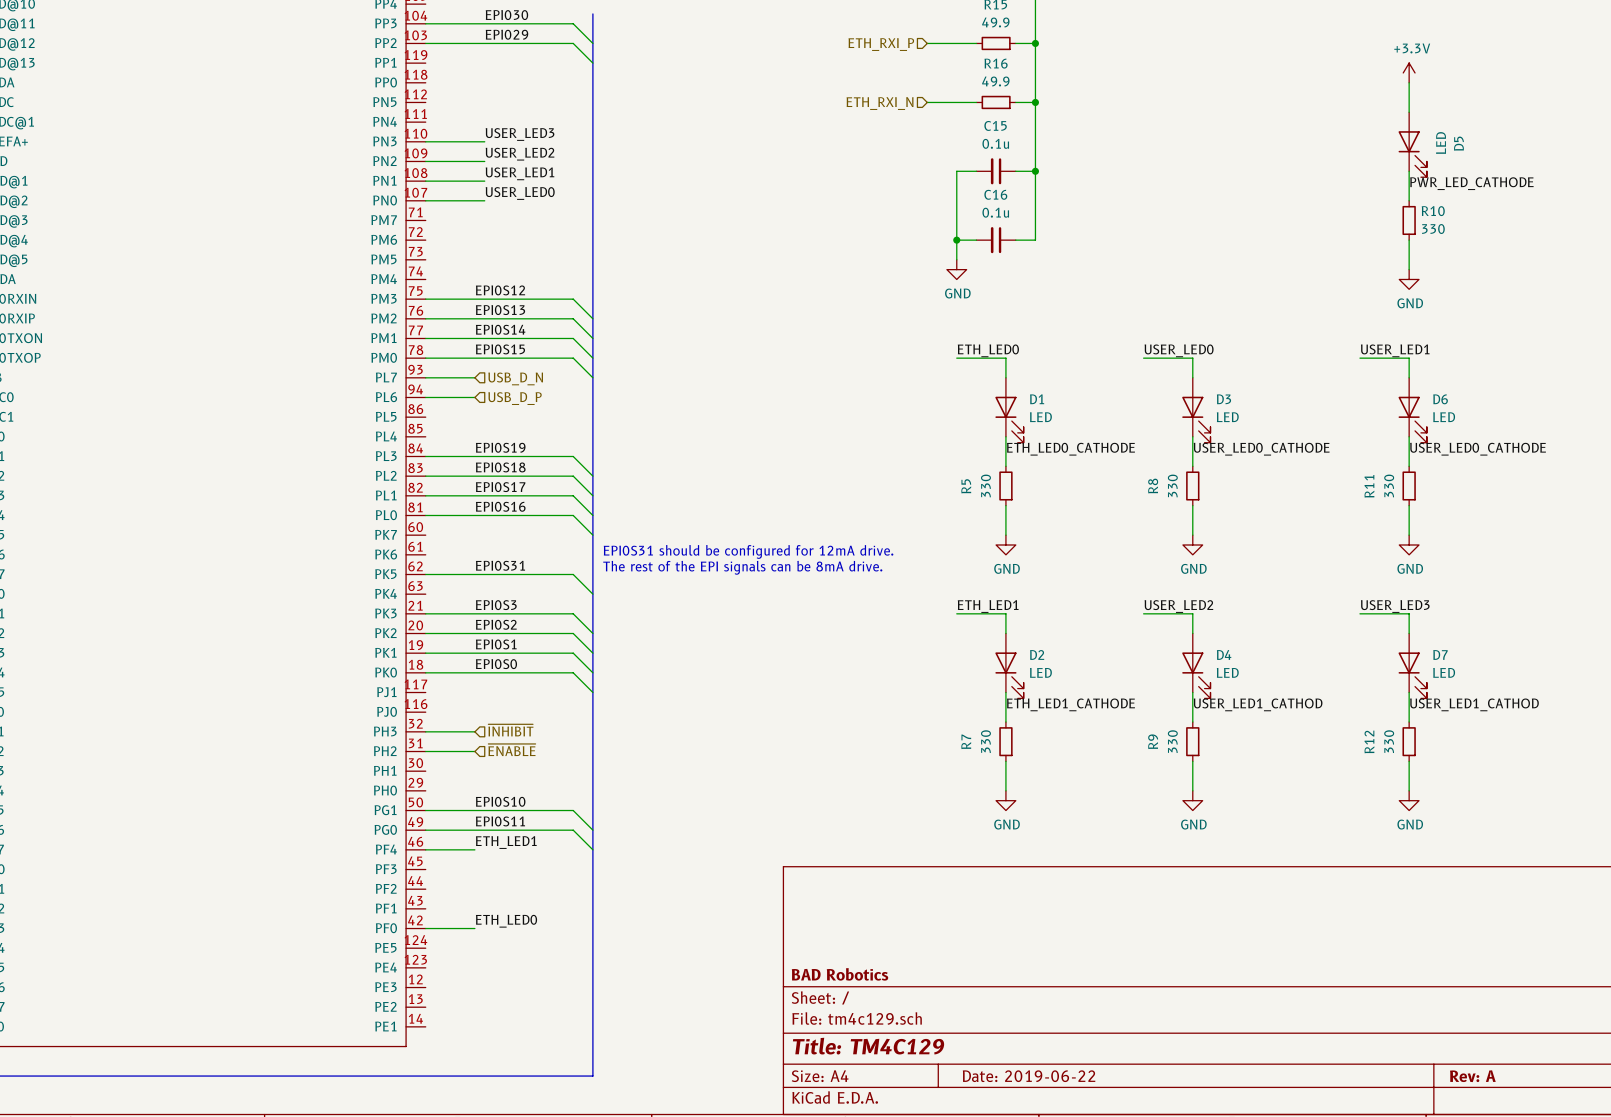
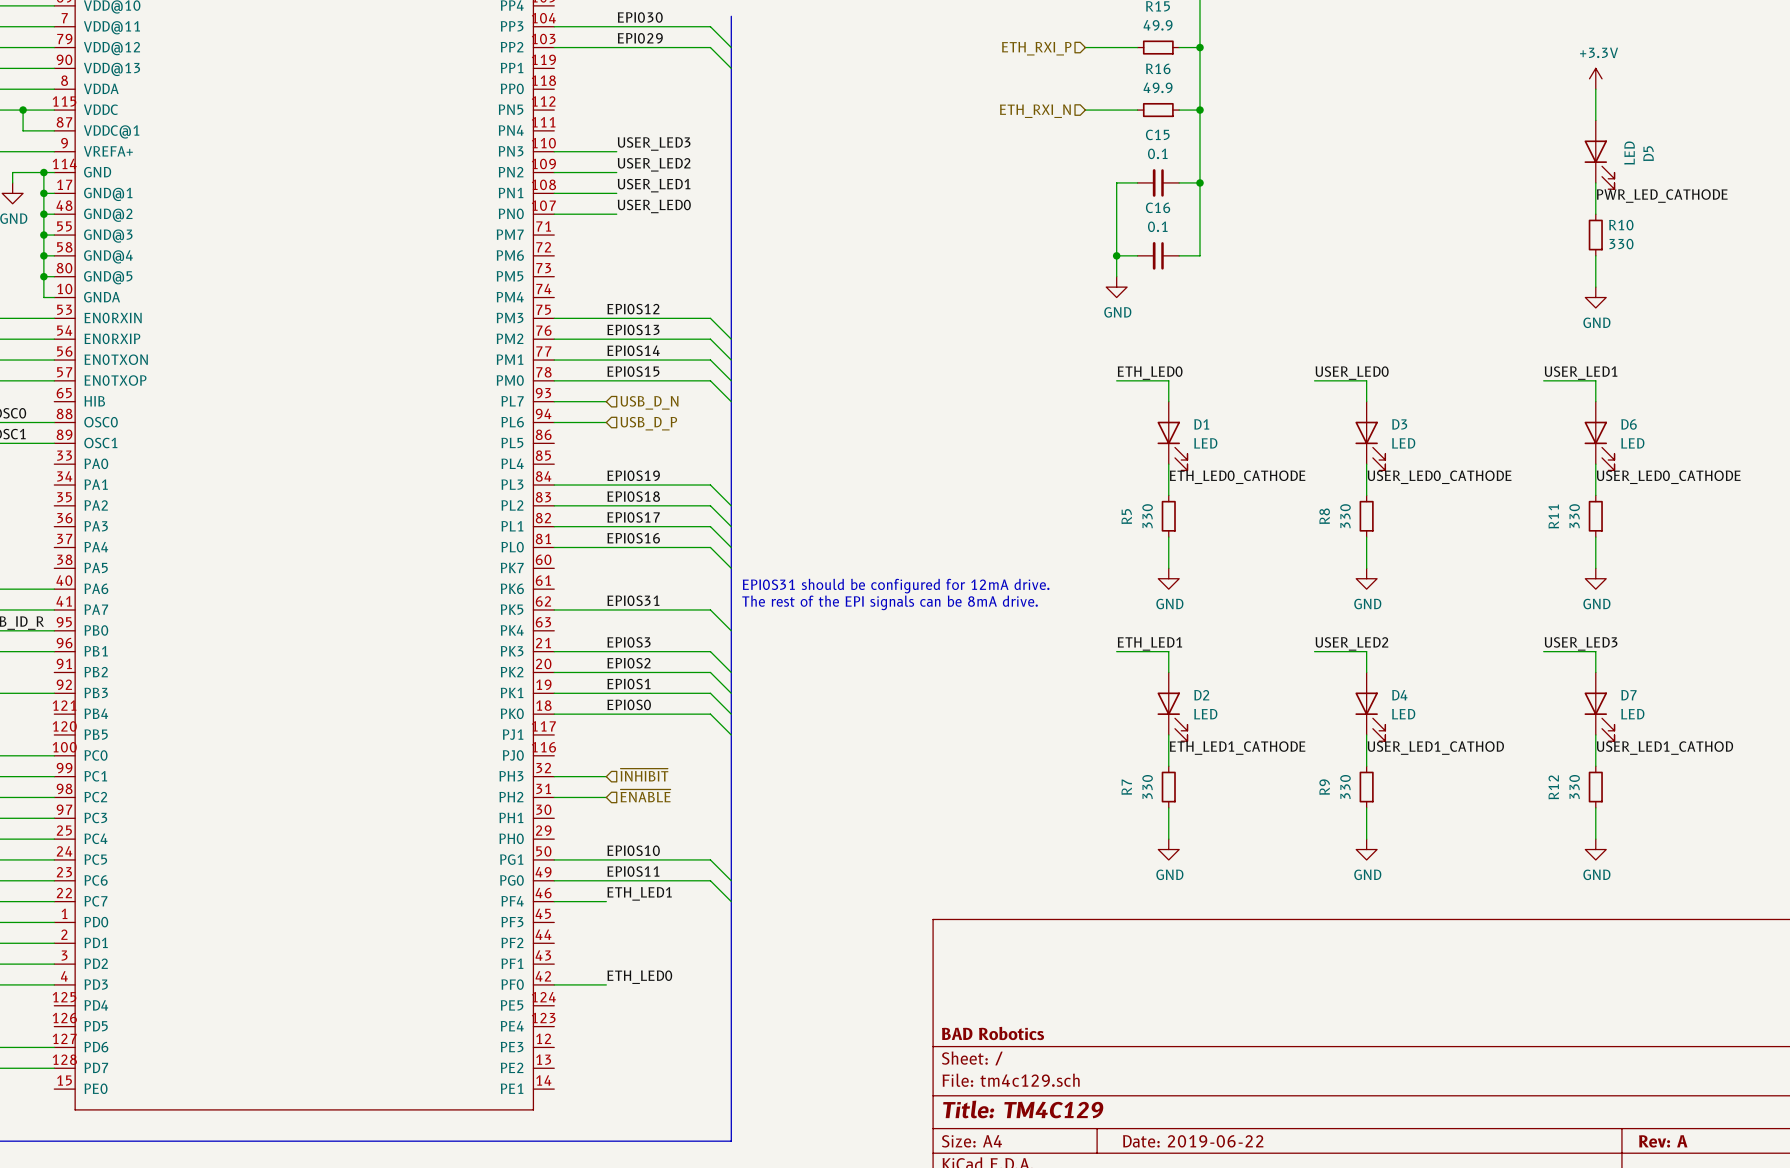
C15 value: 0.1u (995, 143) -> 0.1 (1157, 153)
C16 value: 0.1u (995, 212) -> 0.1 (1157, 226)

